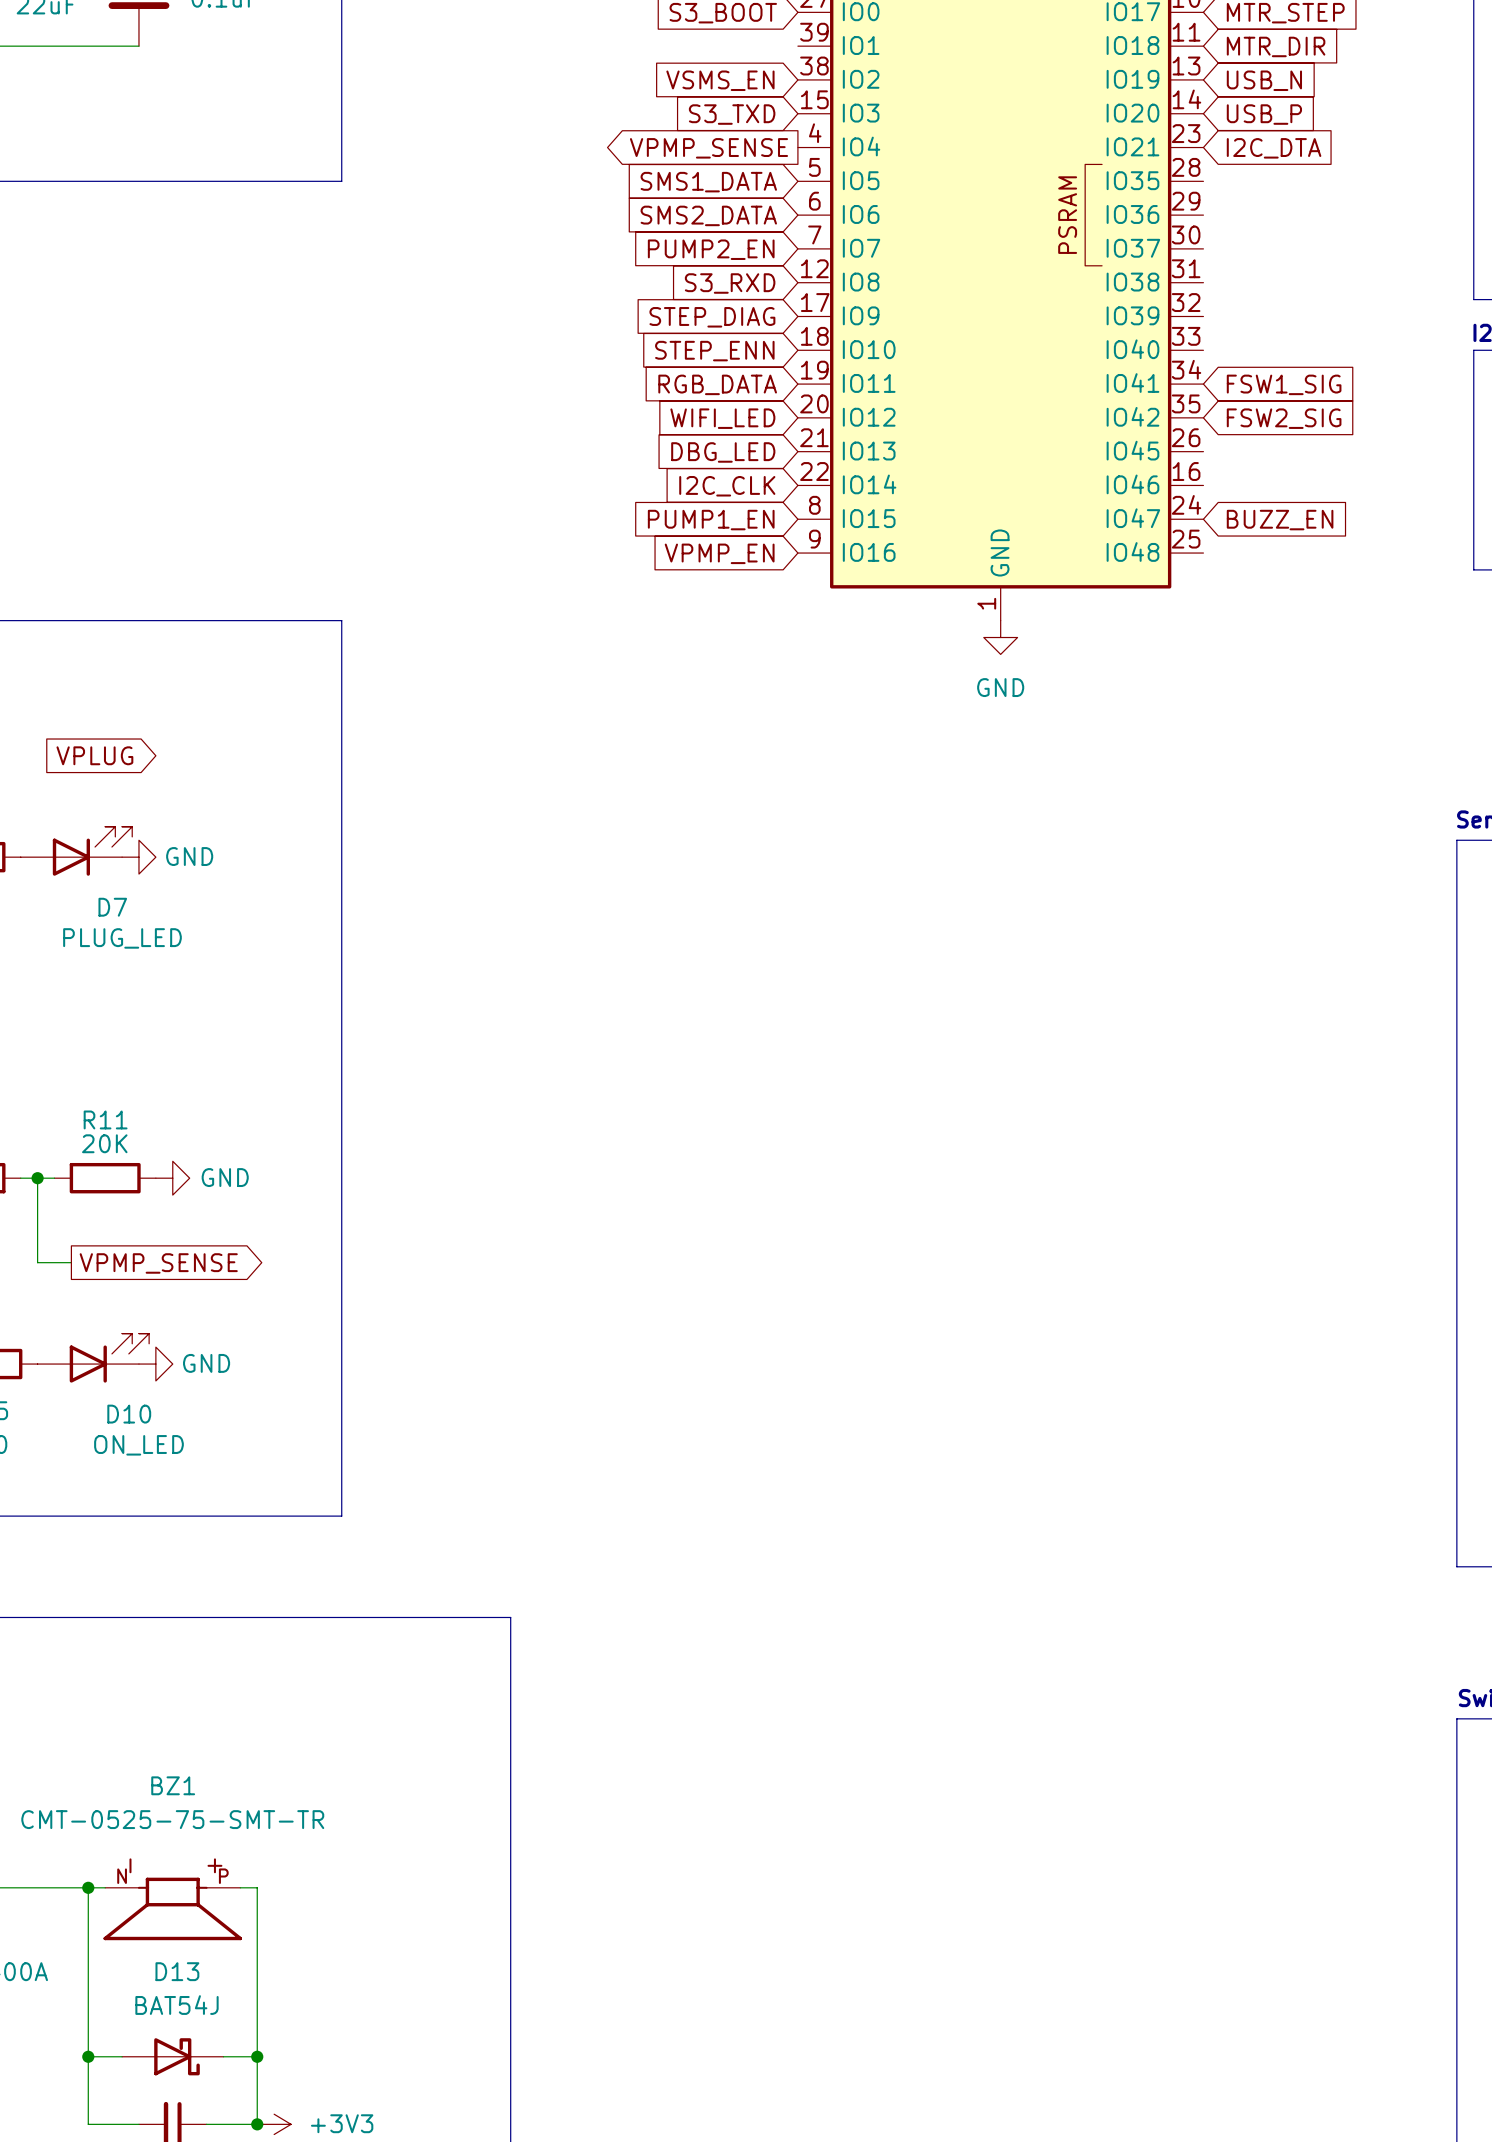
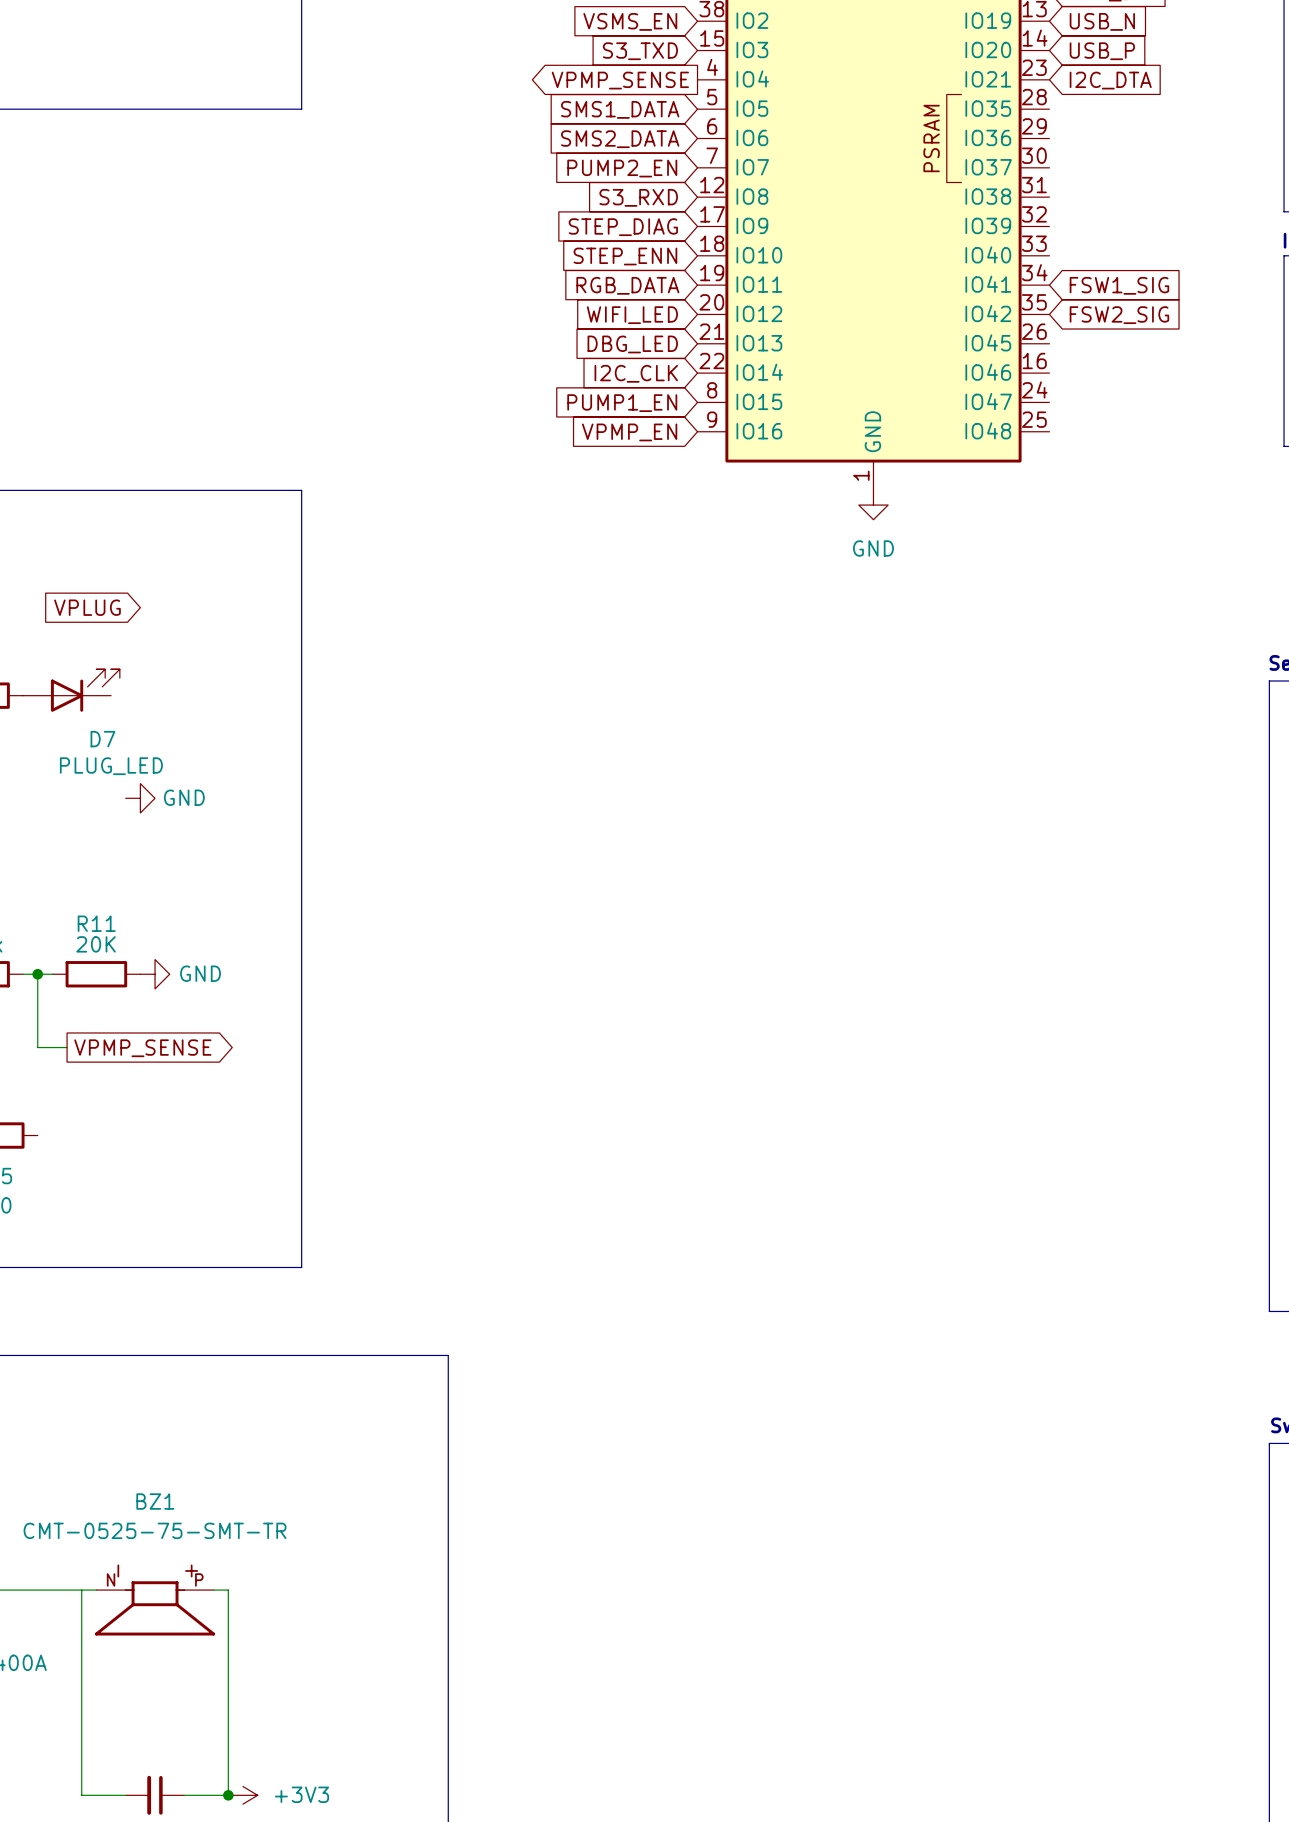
global label: BUZZ_EN (1280, 520) -> none
power symbol position: GND (138, 857) -> GND (140, 798)
D10: ON_LED (93, 1358) -> none
power symbol: GND (155, 1364) -> none
junction: (88, 1887) -> none
wire: (88, 2056) (122, 2056) -> none
junction: (88, 2056) -> none
D13: BAT54J (172, 2056) -> none
wire: (223, 2056) (257, 2056) -> none
junction: (257, 2056) -> none

